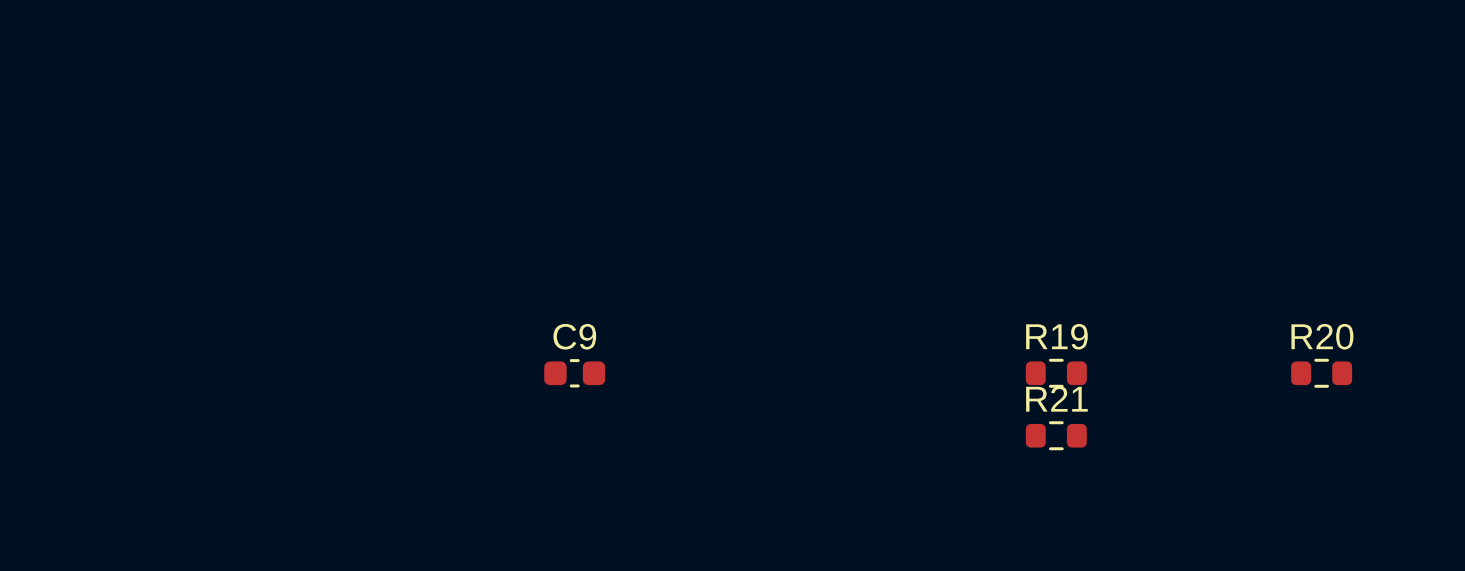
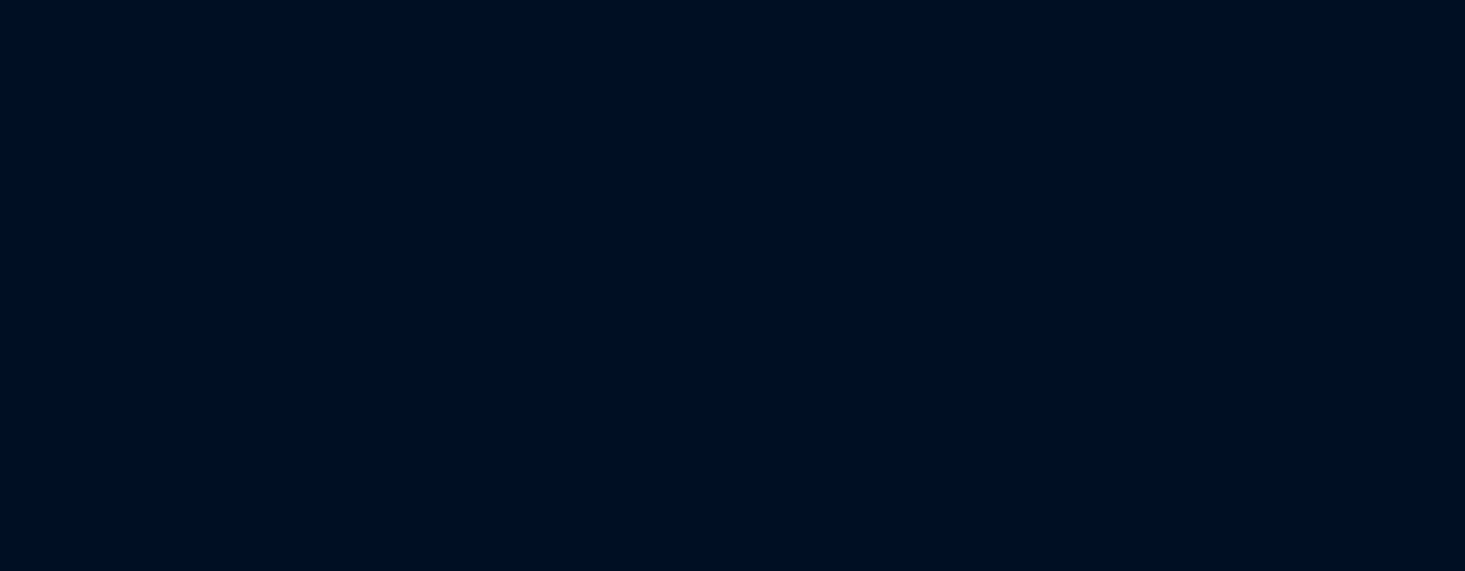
C9: (574, 373) -> none
R19: (1056, 373) -> none
R20: (1321, 373) -> none
R21: (1056, 435) -> none

